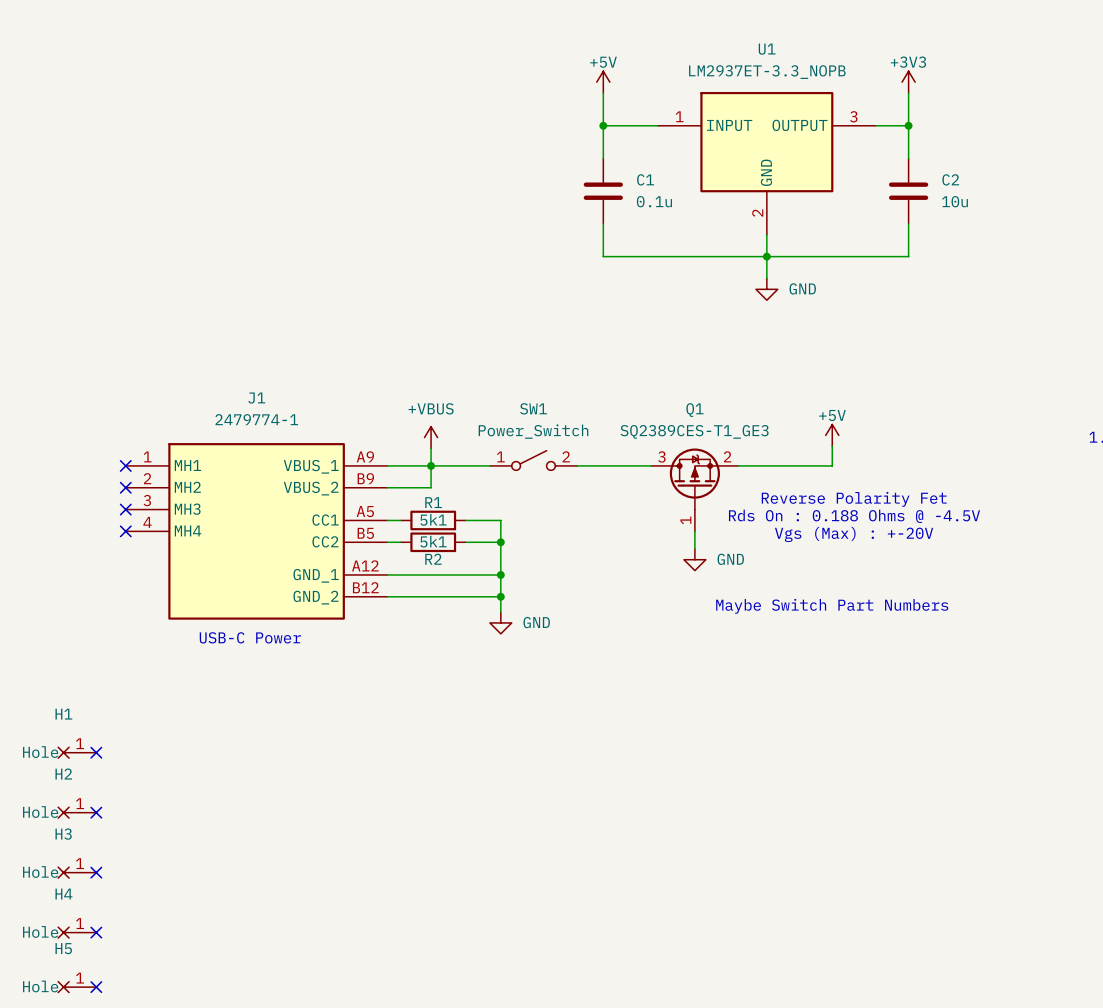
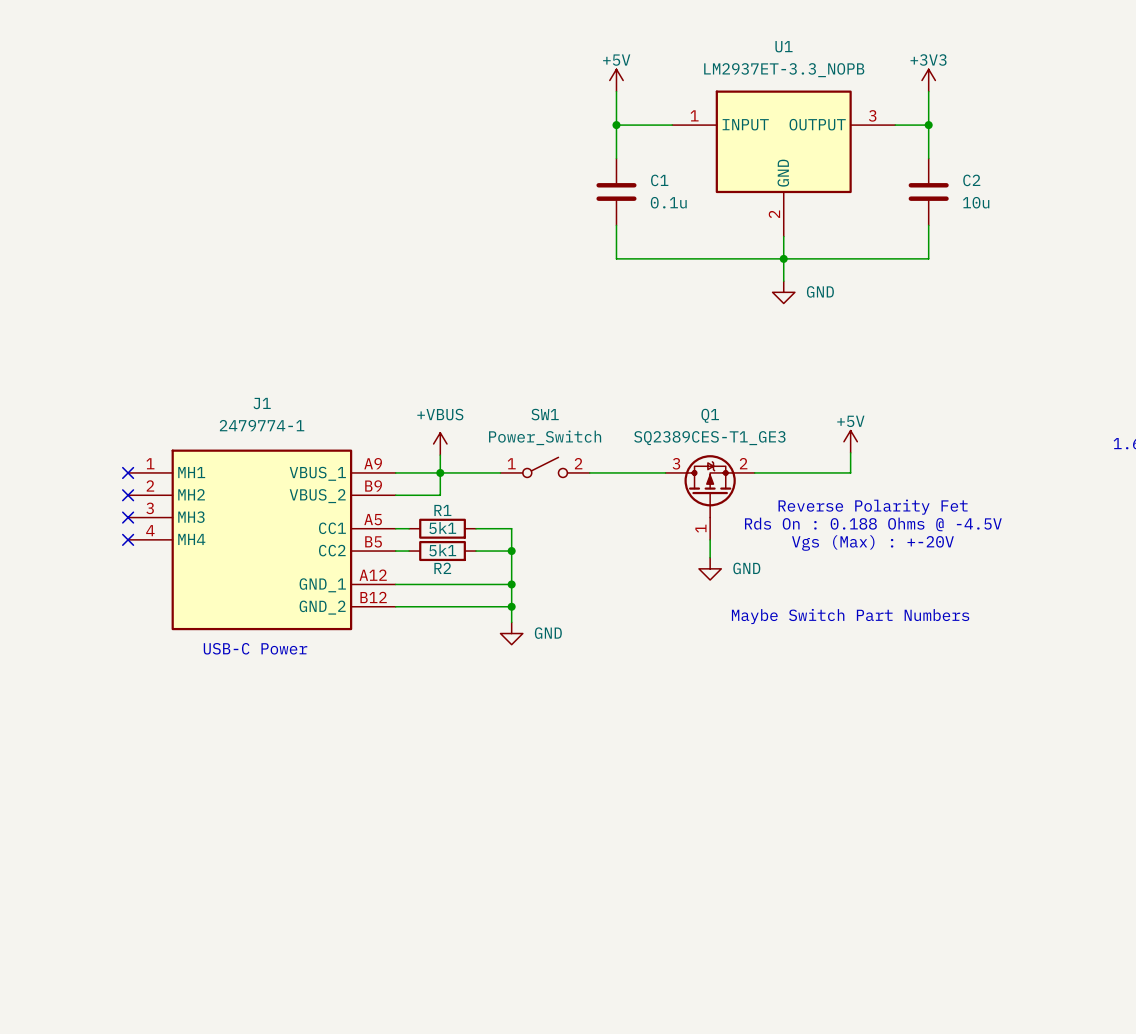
H1: (77, 752) -> none
no-connect mark: (96, 752) -> none
H2: (77, 812) -> none
no-connect mark: (96, 812) -> none
H3: (77, 872) -> none
no-connect mark: (96, 872) -> none
H4: (77, 932) -> none
no-connect mark: (96, 932) -> none
H5: (77, 987) -> none
no-connect mark: (96, 987) -> none

